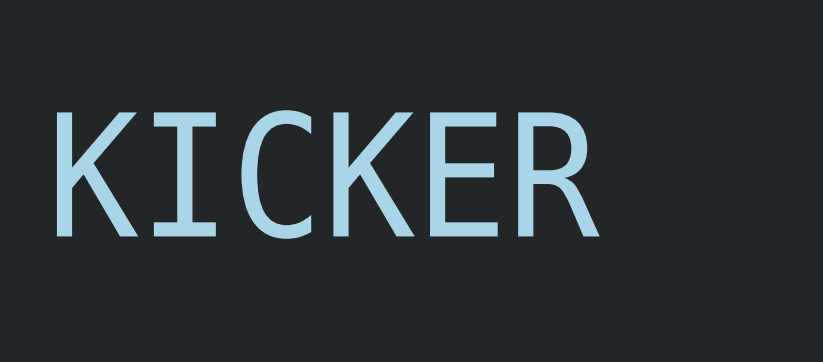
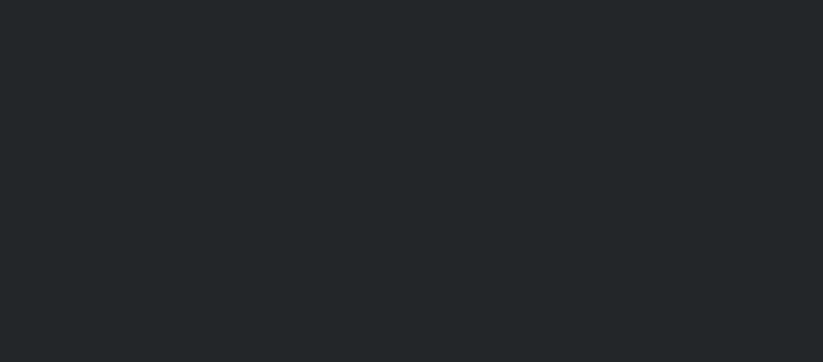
text: KICKER (328, 174) -> none

